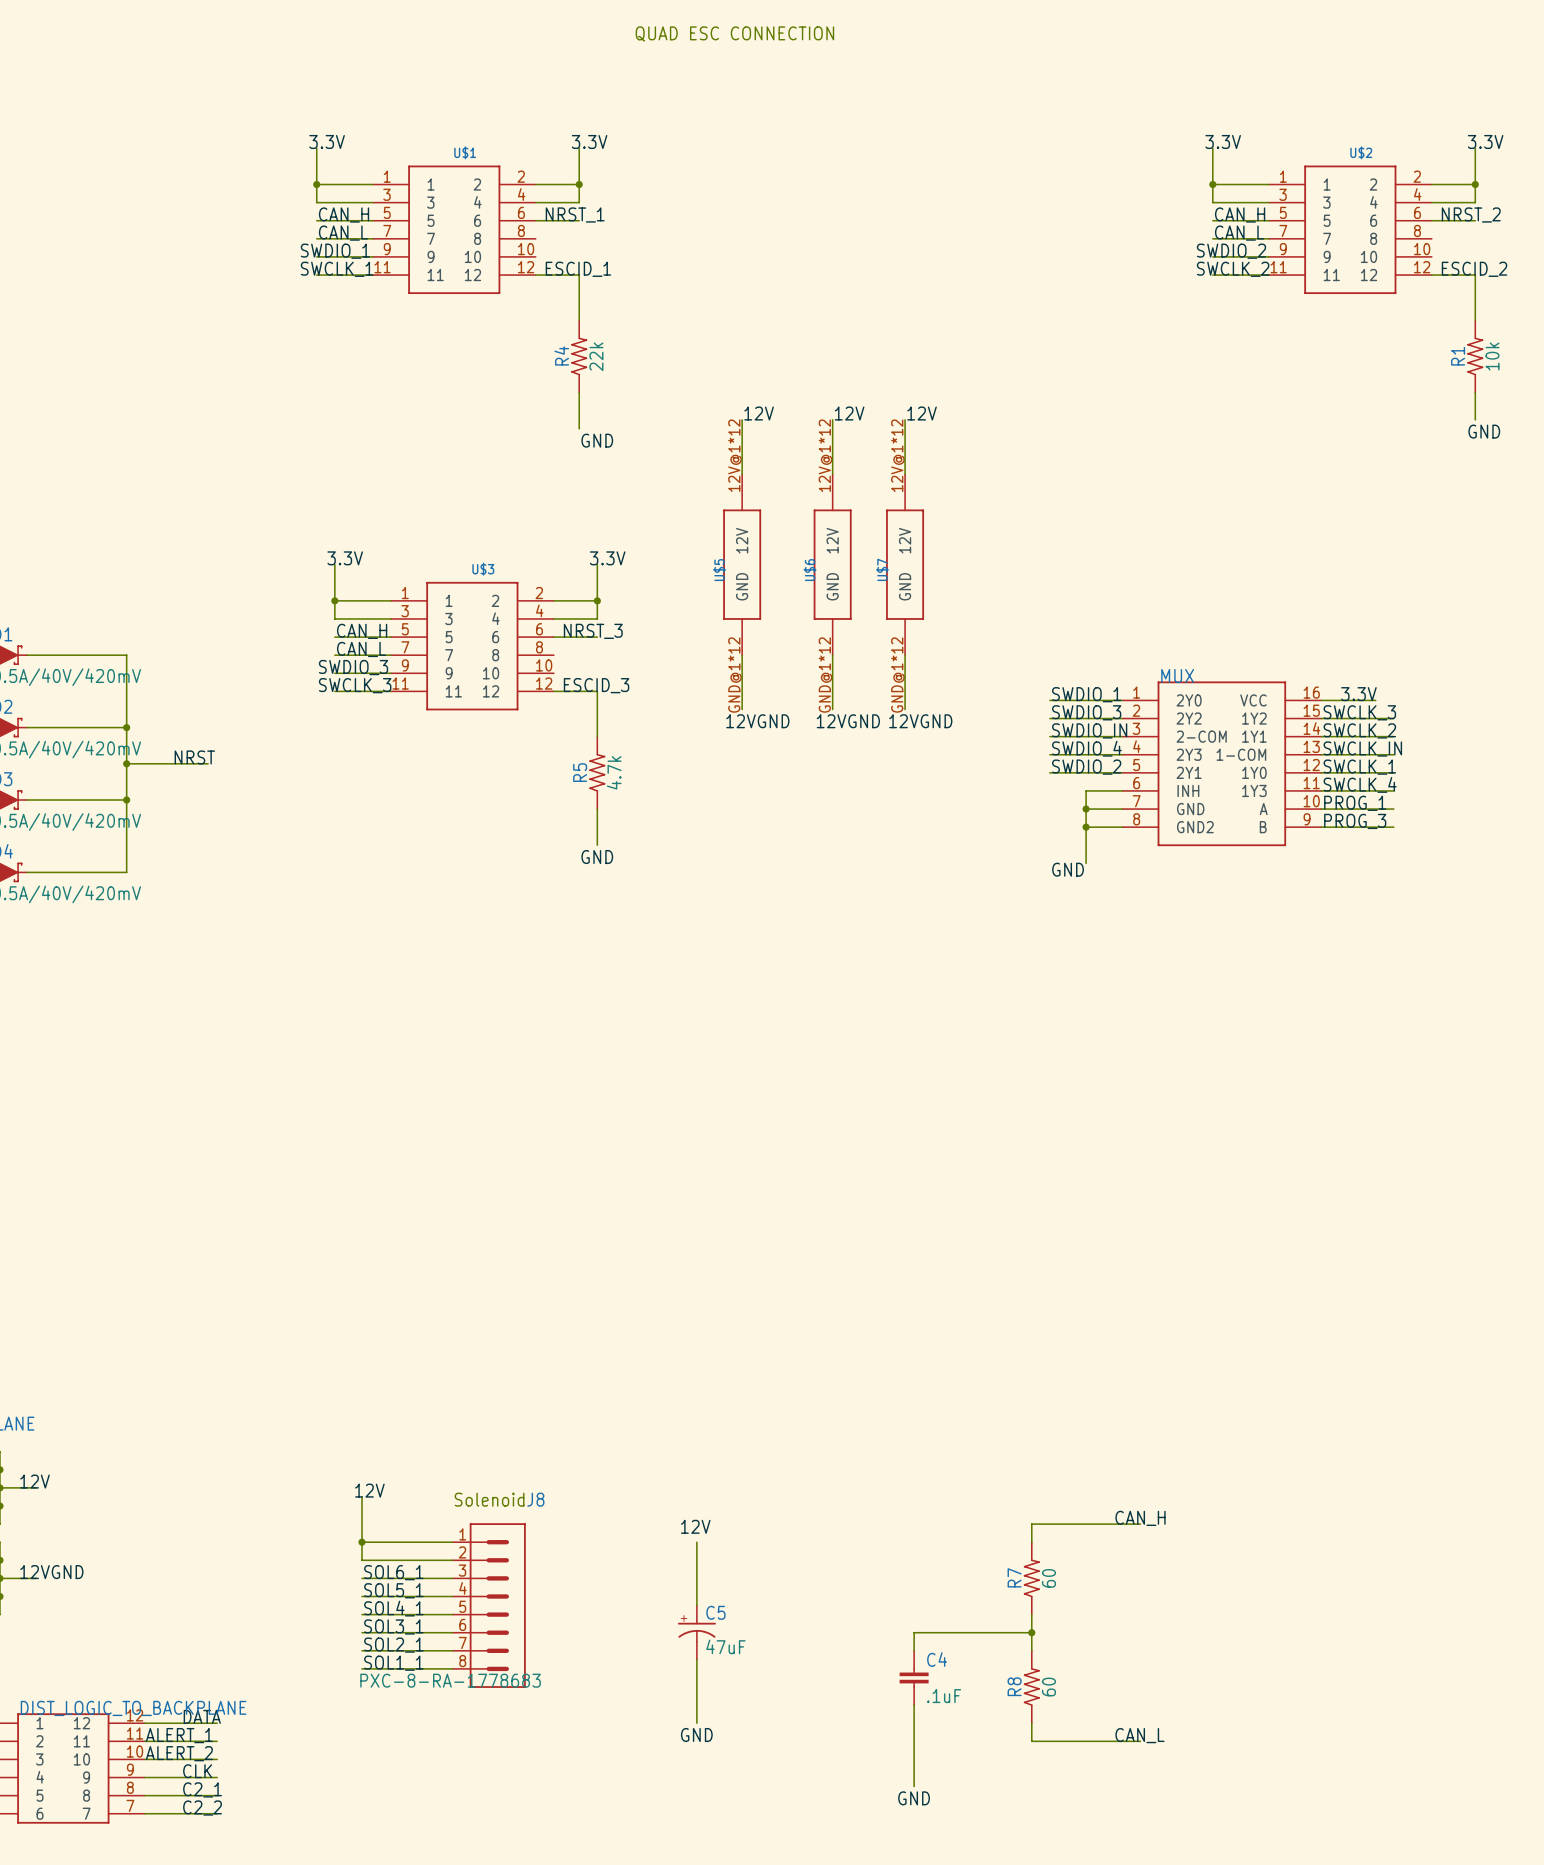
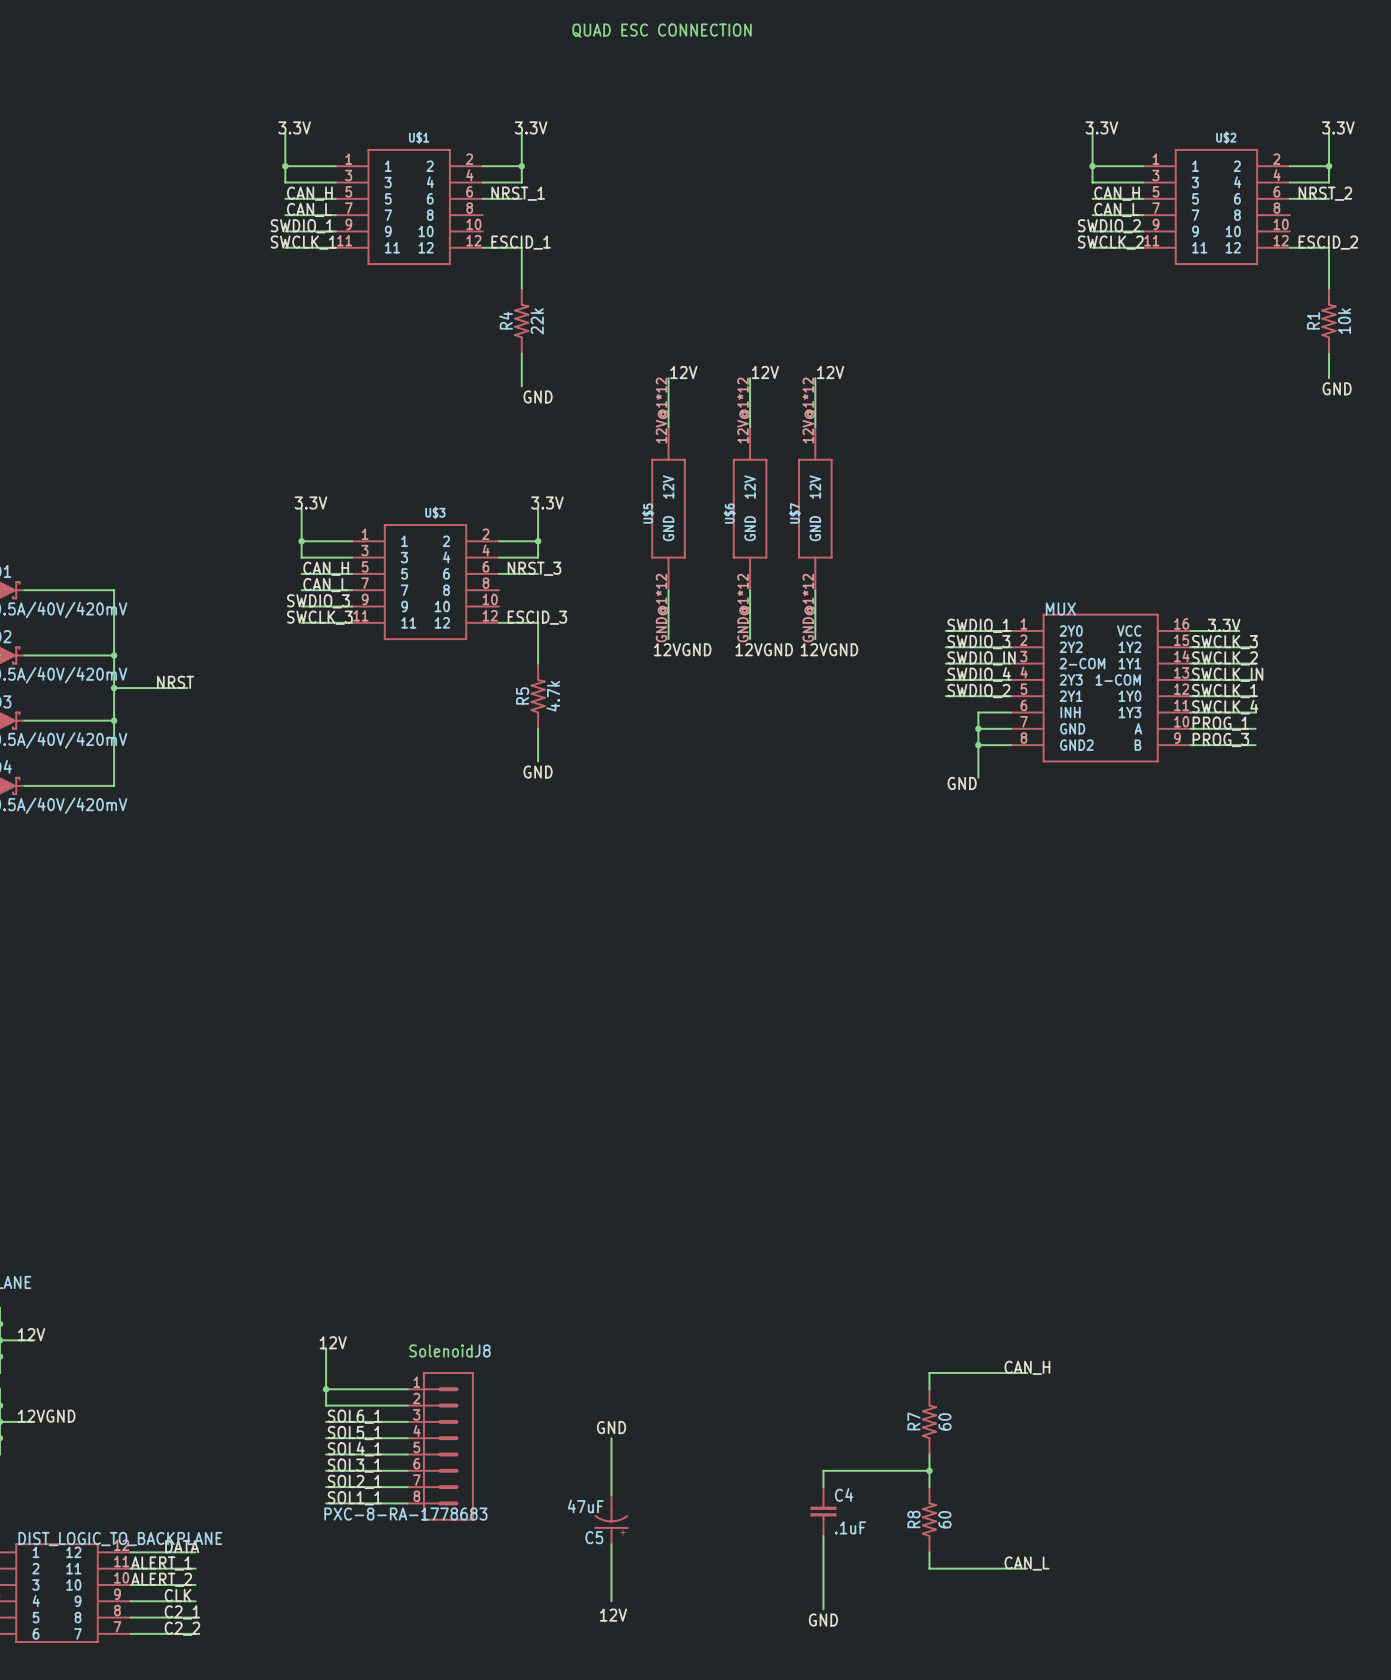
label: 12V (695, 1526) -> none
wire: (696, 1542) (696, 1605) -> (611, 1438) (611, 1495)
C5 rotation: 0° (696, 1628) -> 180° (611, 1523)
C5 position: (696, 1632) -> (611, 1519)
wire: (696, 1659) (696, 1723) -> (611, 1544) (611, 1601)
label position: GND (696, 1734) -> GND (611, 1427)
label: none -> 12V (613, 1615)

